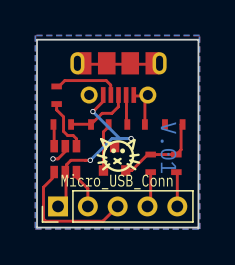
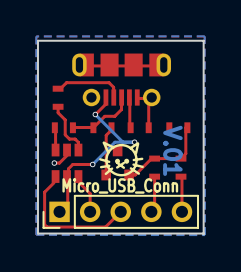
drawing: [111, 148, 126, 154] -> none
drawing: none -> [115, 158, 130, 164]

